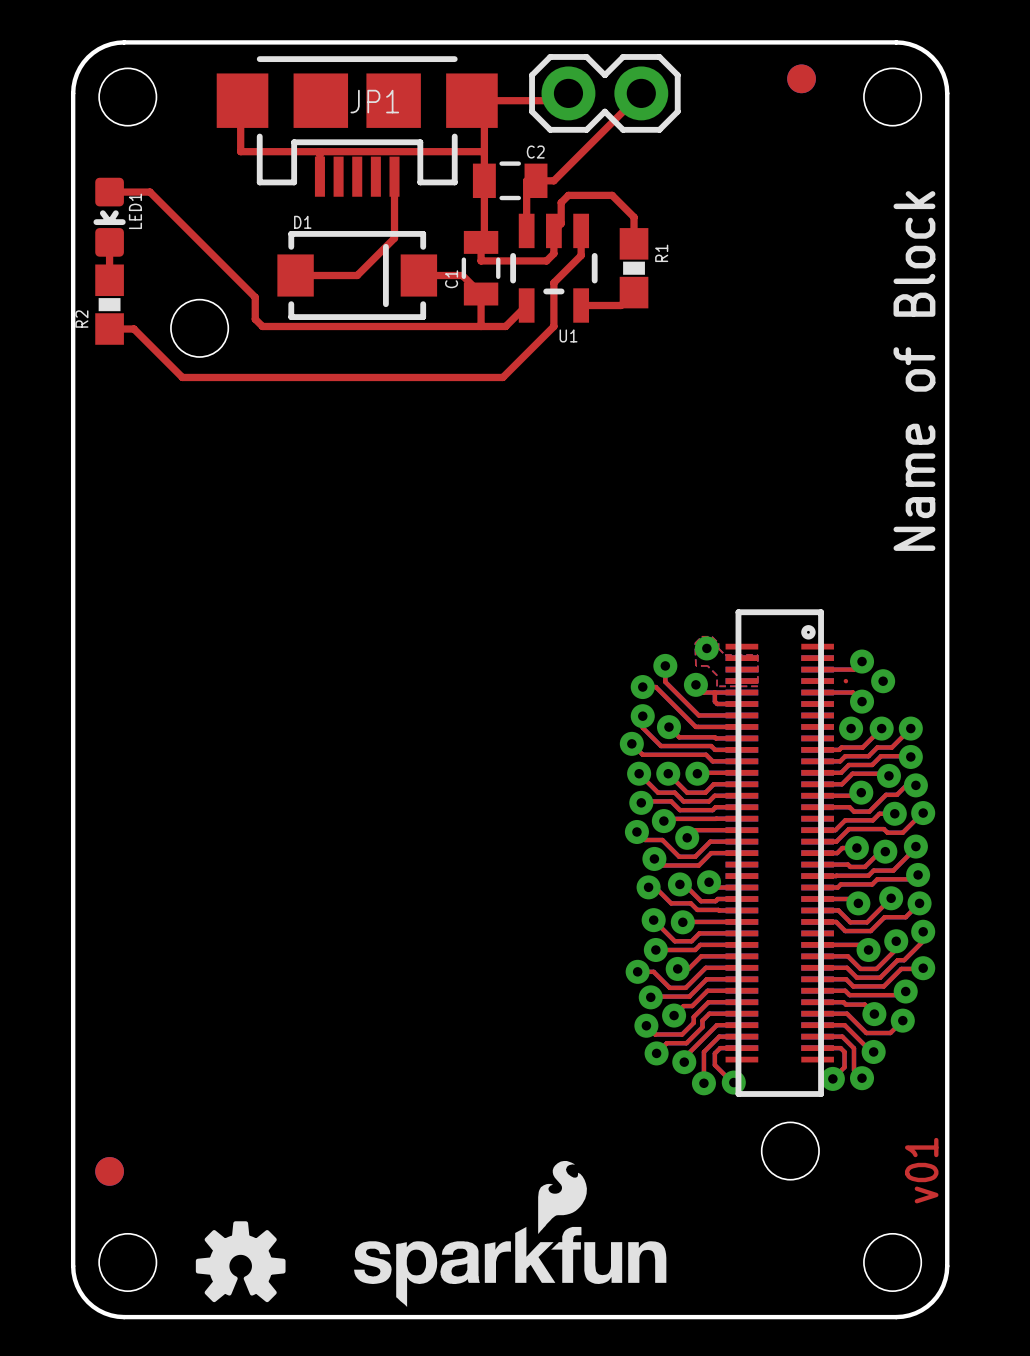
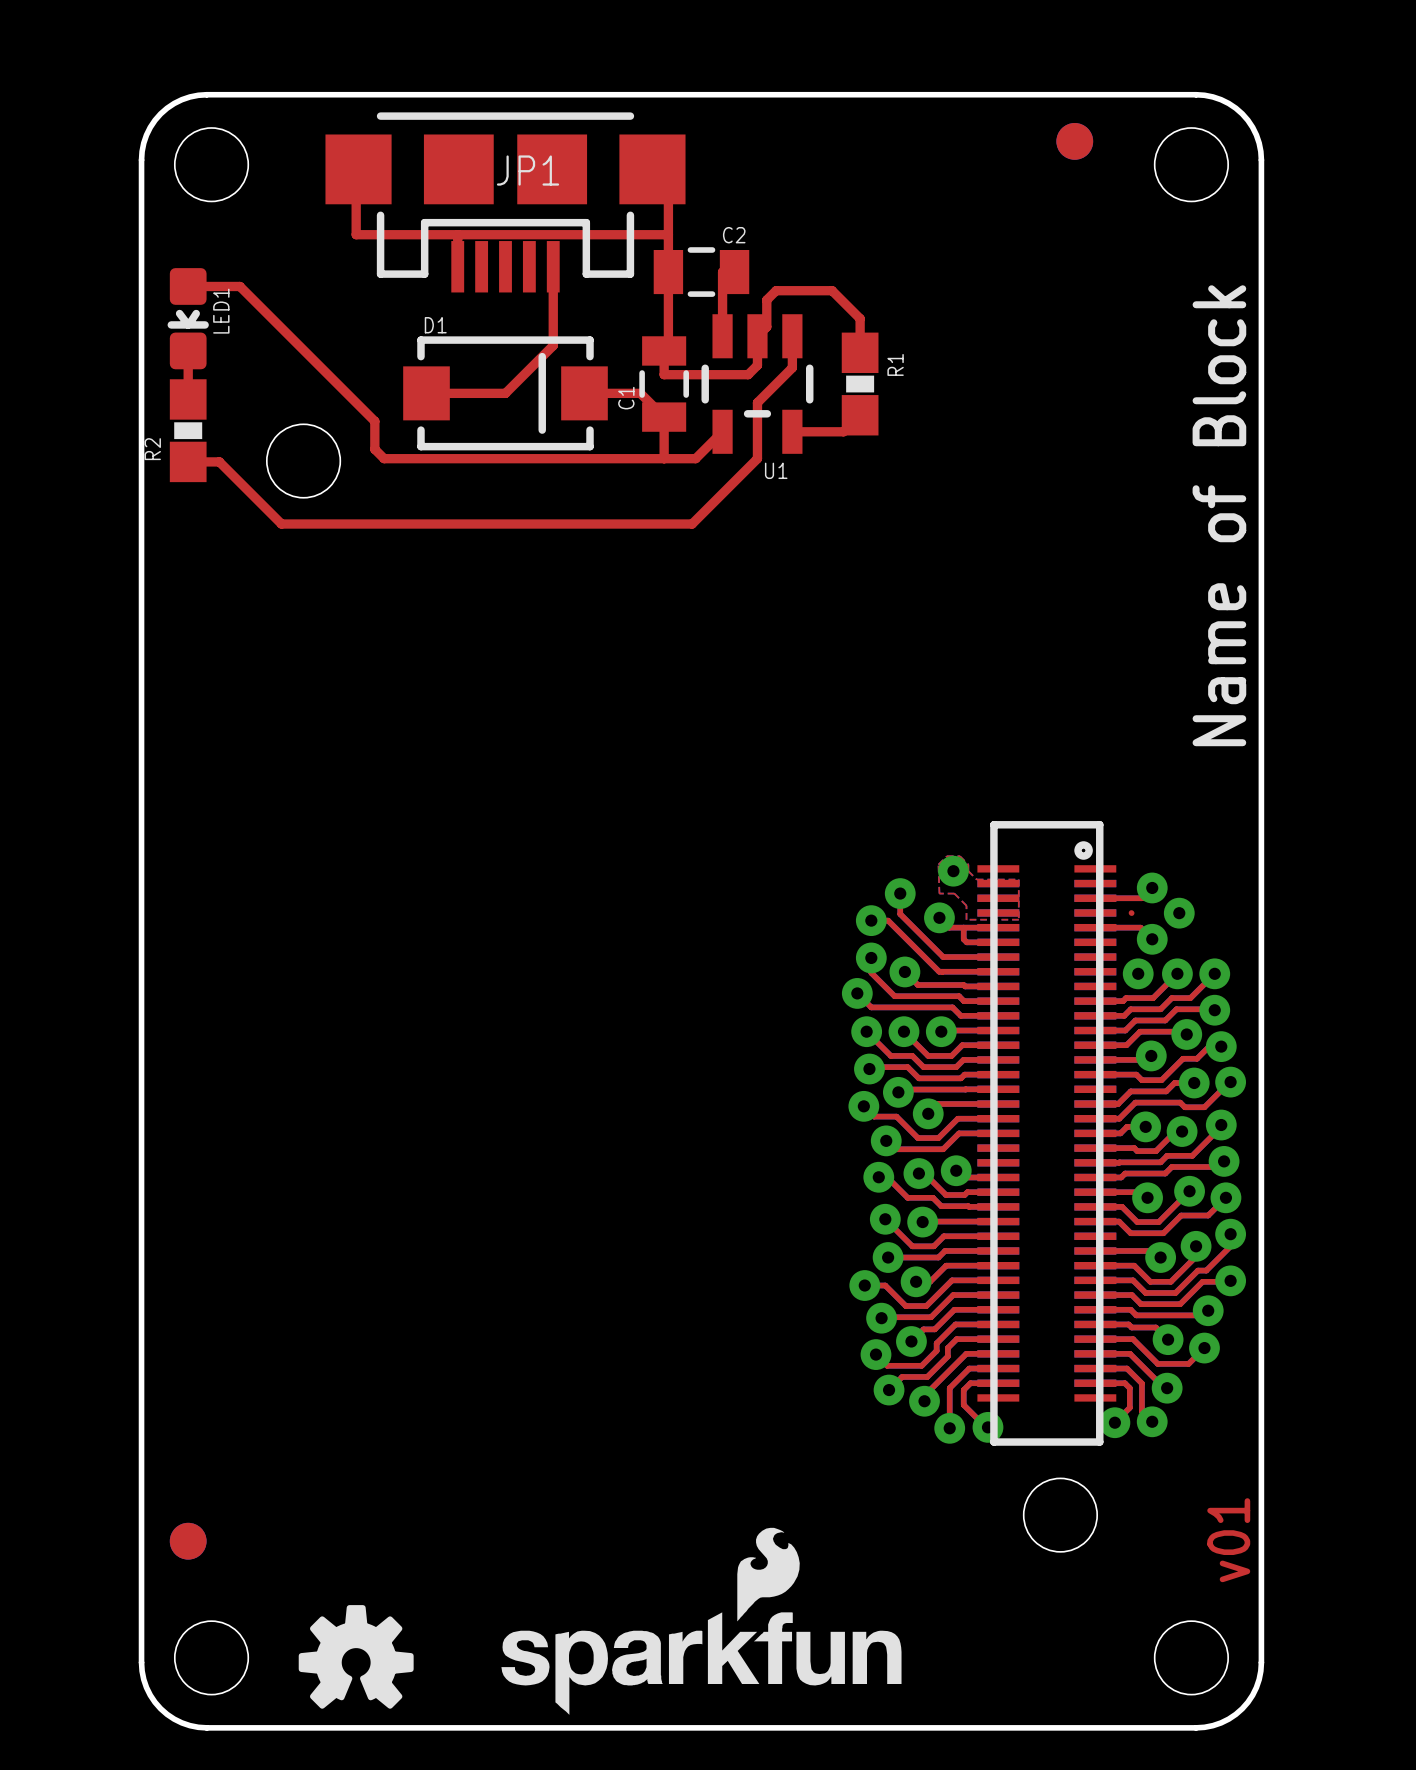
top track: (568, 93) (561, 100) (484, 100) -> none
part: (604, 93) -> none
top track: (641, 93) (553, 180) (536, 180) -> none

